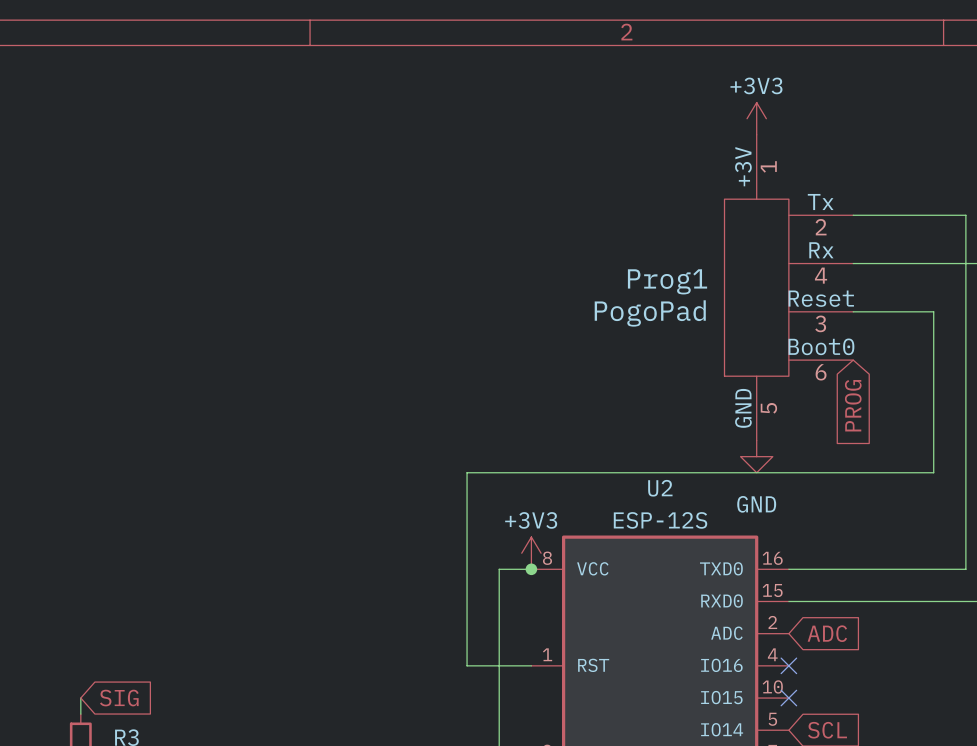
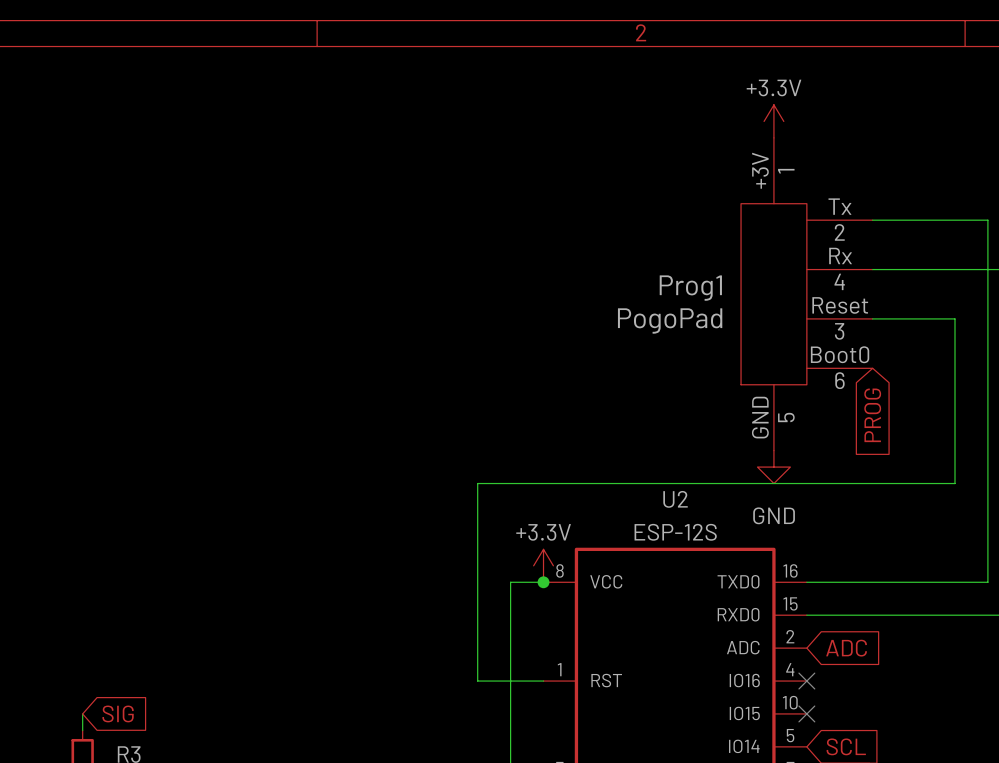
power symbol: +3V3 (756, 118) -> +3.3V (773, 121)
power symbol: +3V3 (531, 553) -> +3.3V (543, 565)

